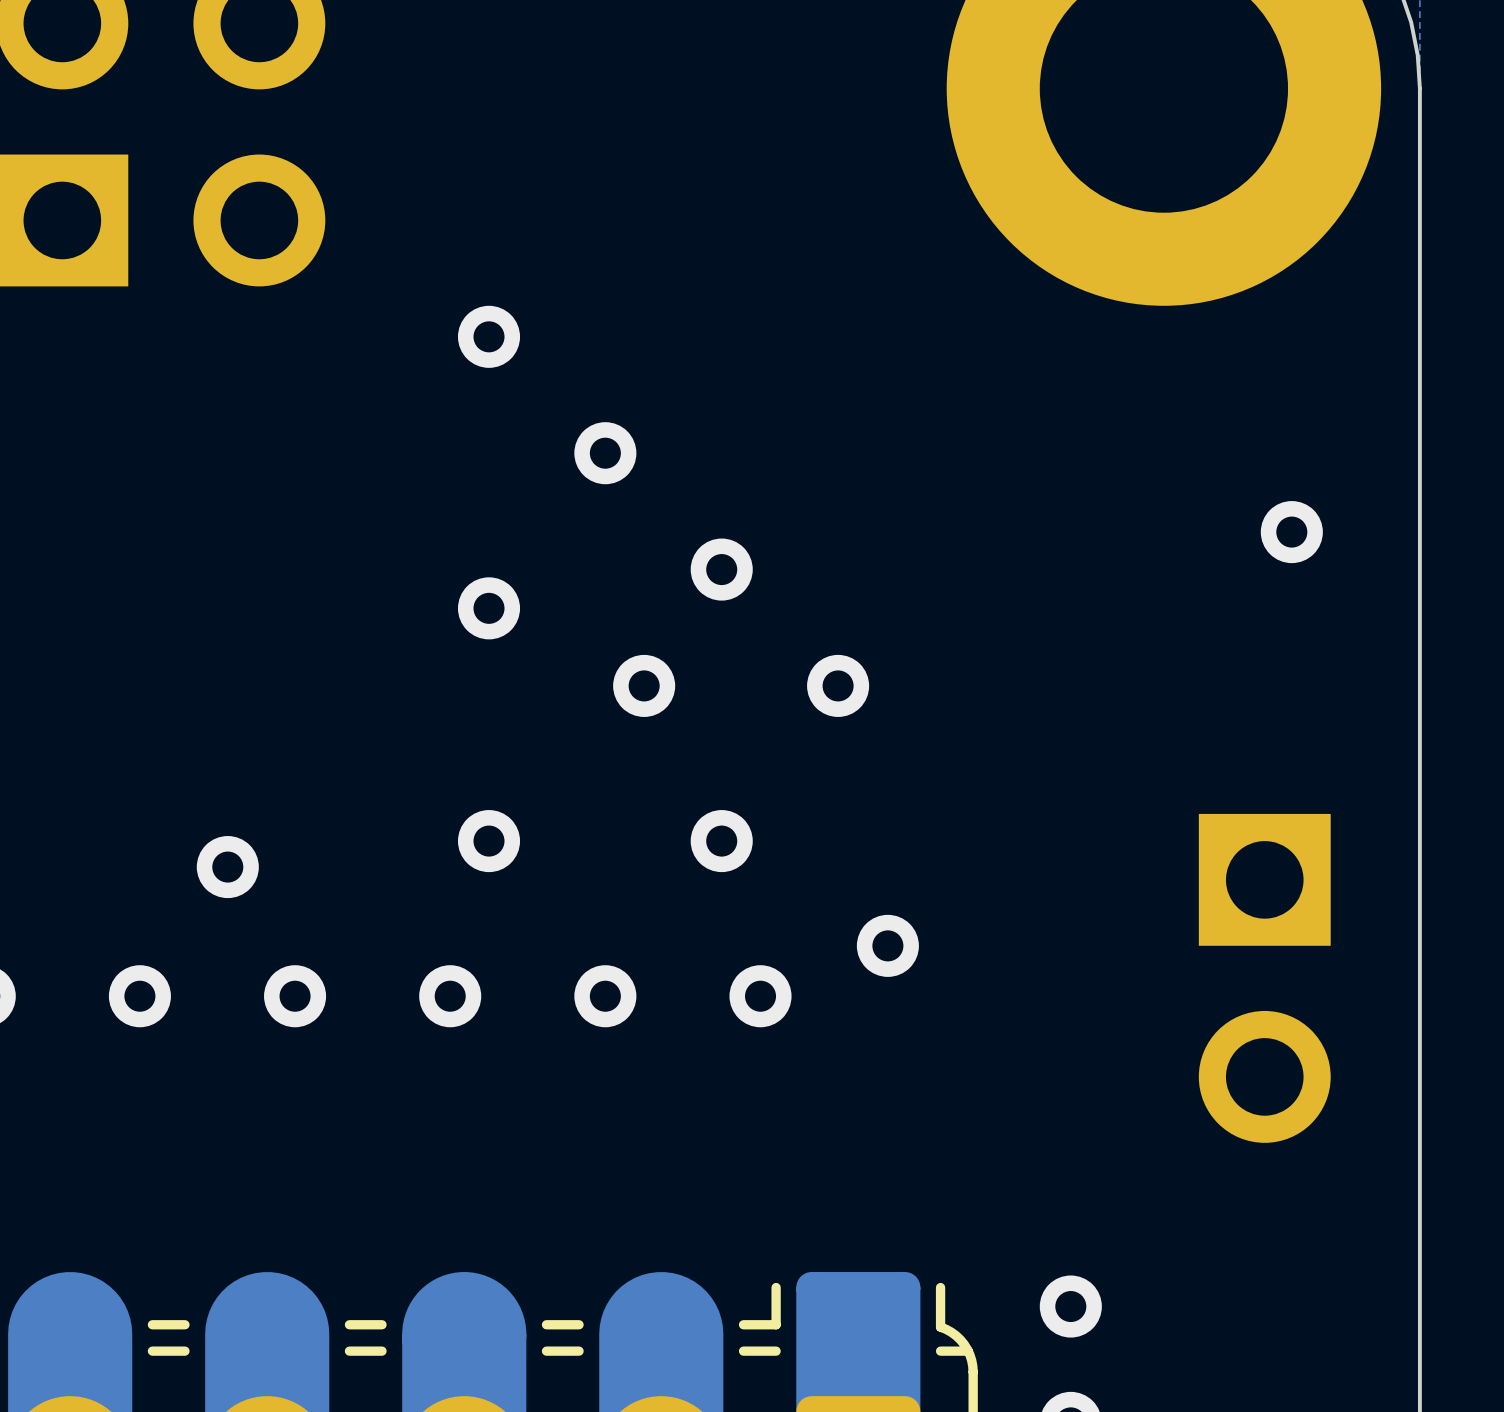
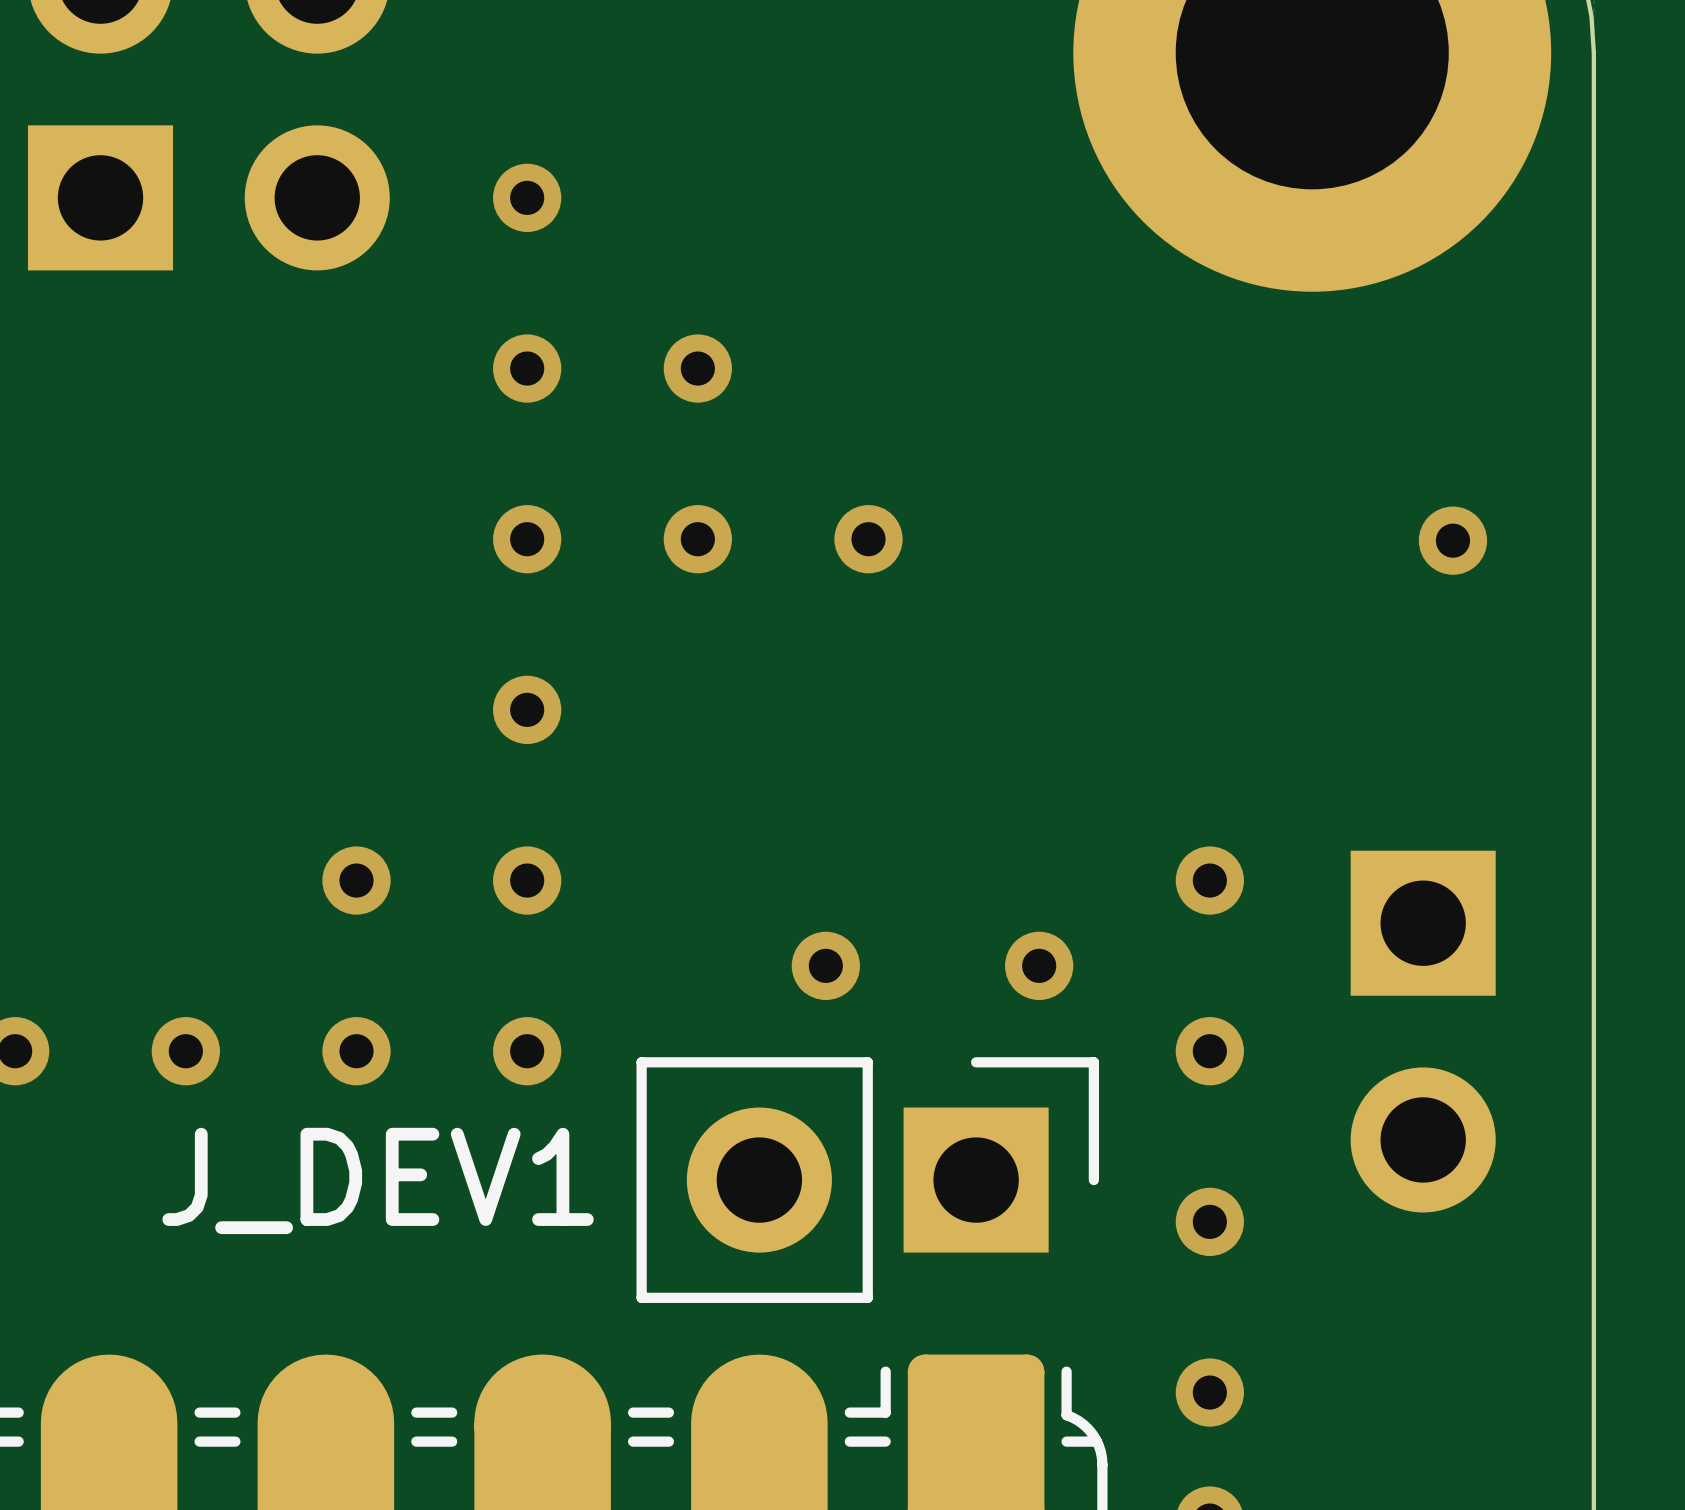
via: none -> (527, 197)
via position: (489, 336) -> (527, 368)
via: none -> (697, 368)
via: (605, 453) -> none
via: none -> (527, 539)
via: none -> (697, 539)
via position: (721, 569) -> (868, 539)
via: (489, 608) -> none
via: none -> (527, 709)
via: (644, 685) -> none
via: (838, 685) -> none
via position: (489, 841) -> (527, 880)
via: (721, 841) -> none
via: none -> (1209, 880)
via position: (227, 867) -> (356, 880)
via: none -> (825, 965)
via position: (887, 945) -> (1039, 965)
via: (605, 996) -> none
via: (760, 996) -> none
via: none -> (1209, 1051)
J_DEV1: none -> (867, 1180)
via: none -> (1209, 1221)

